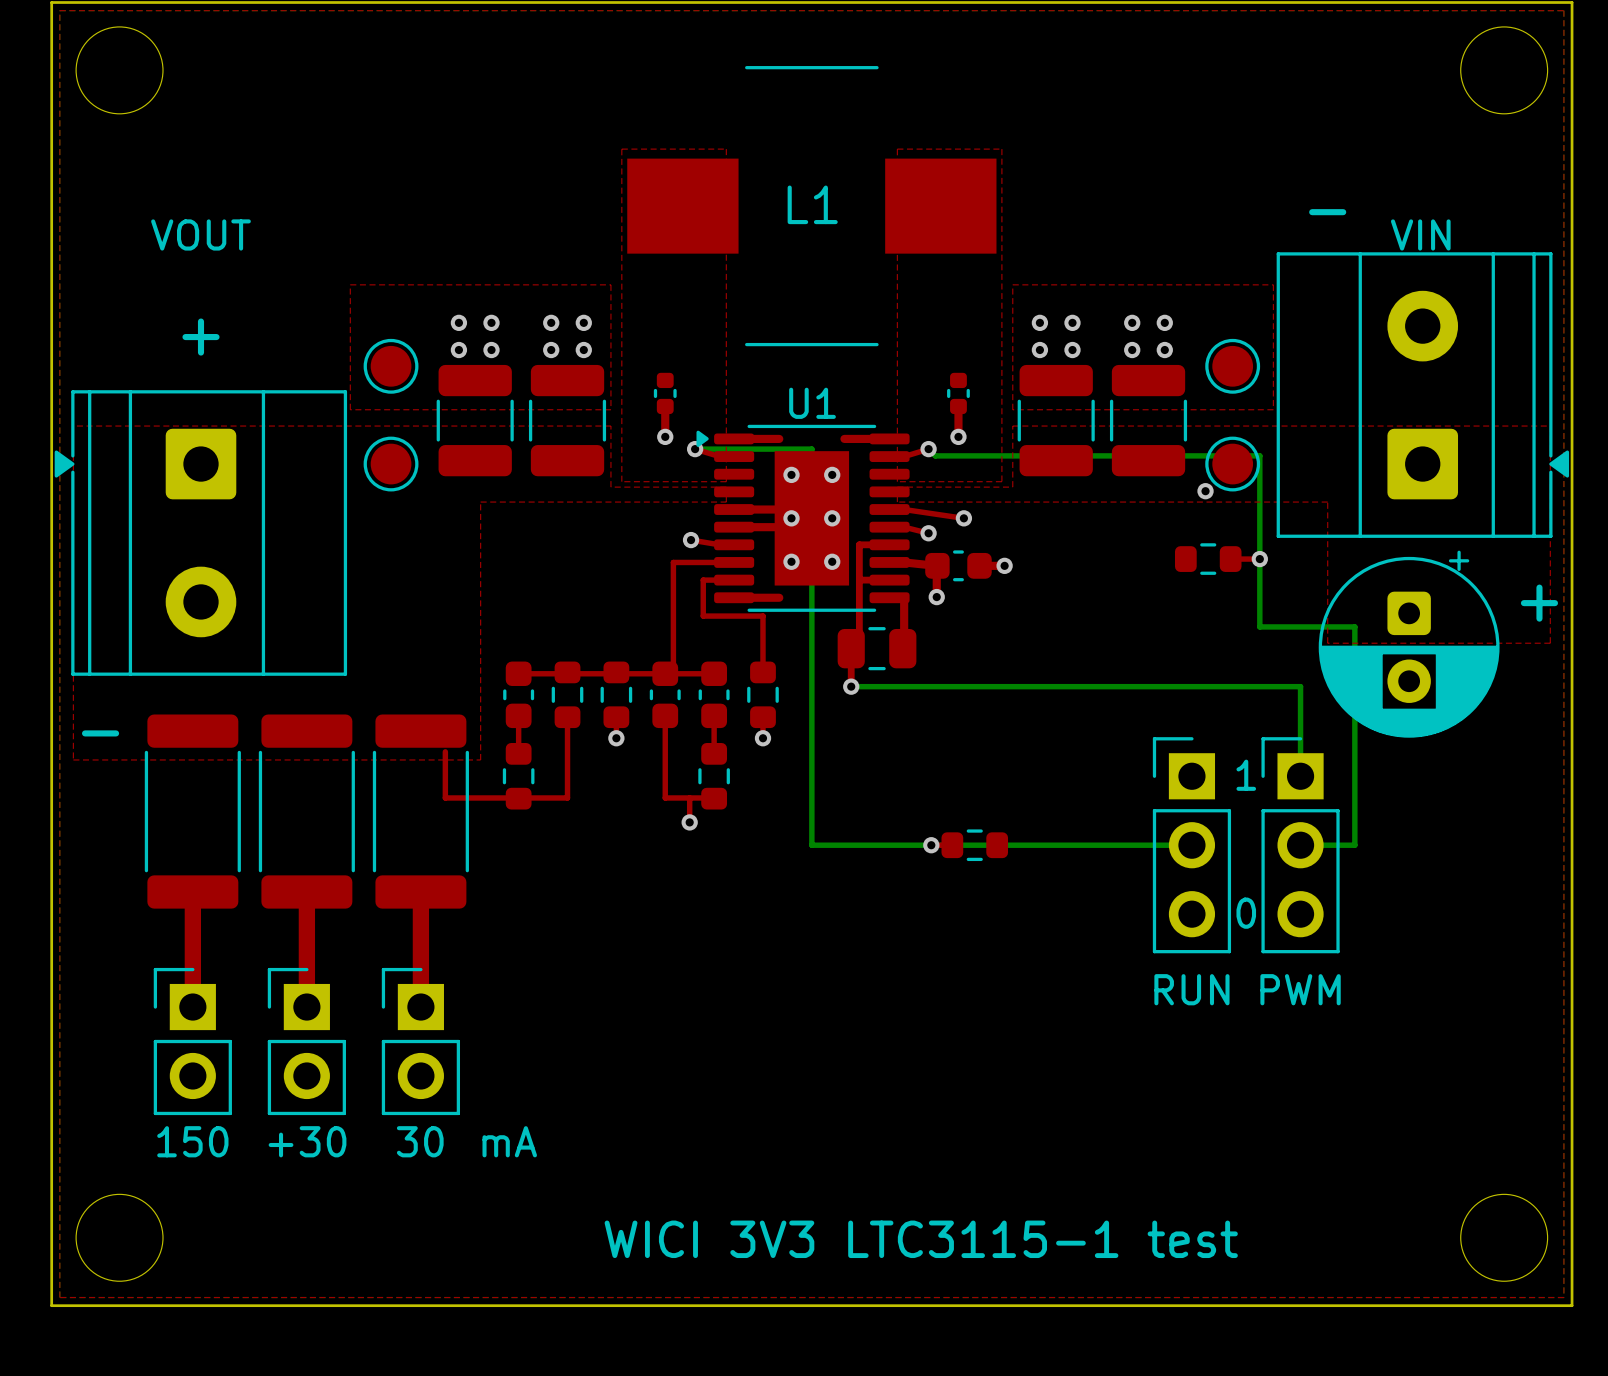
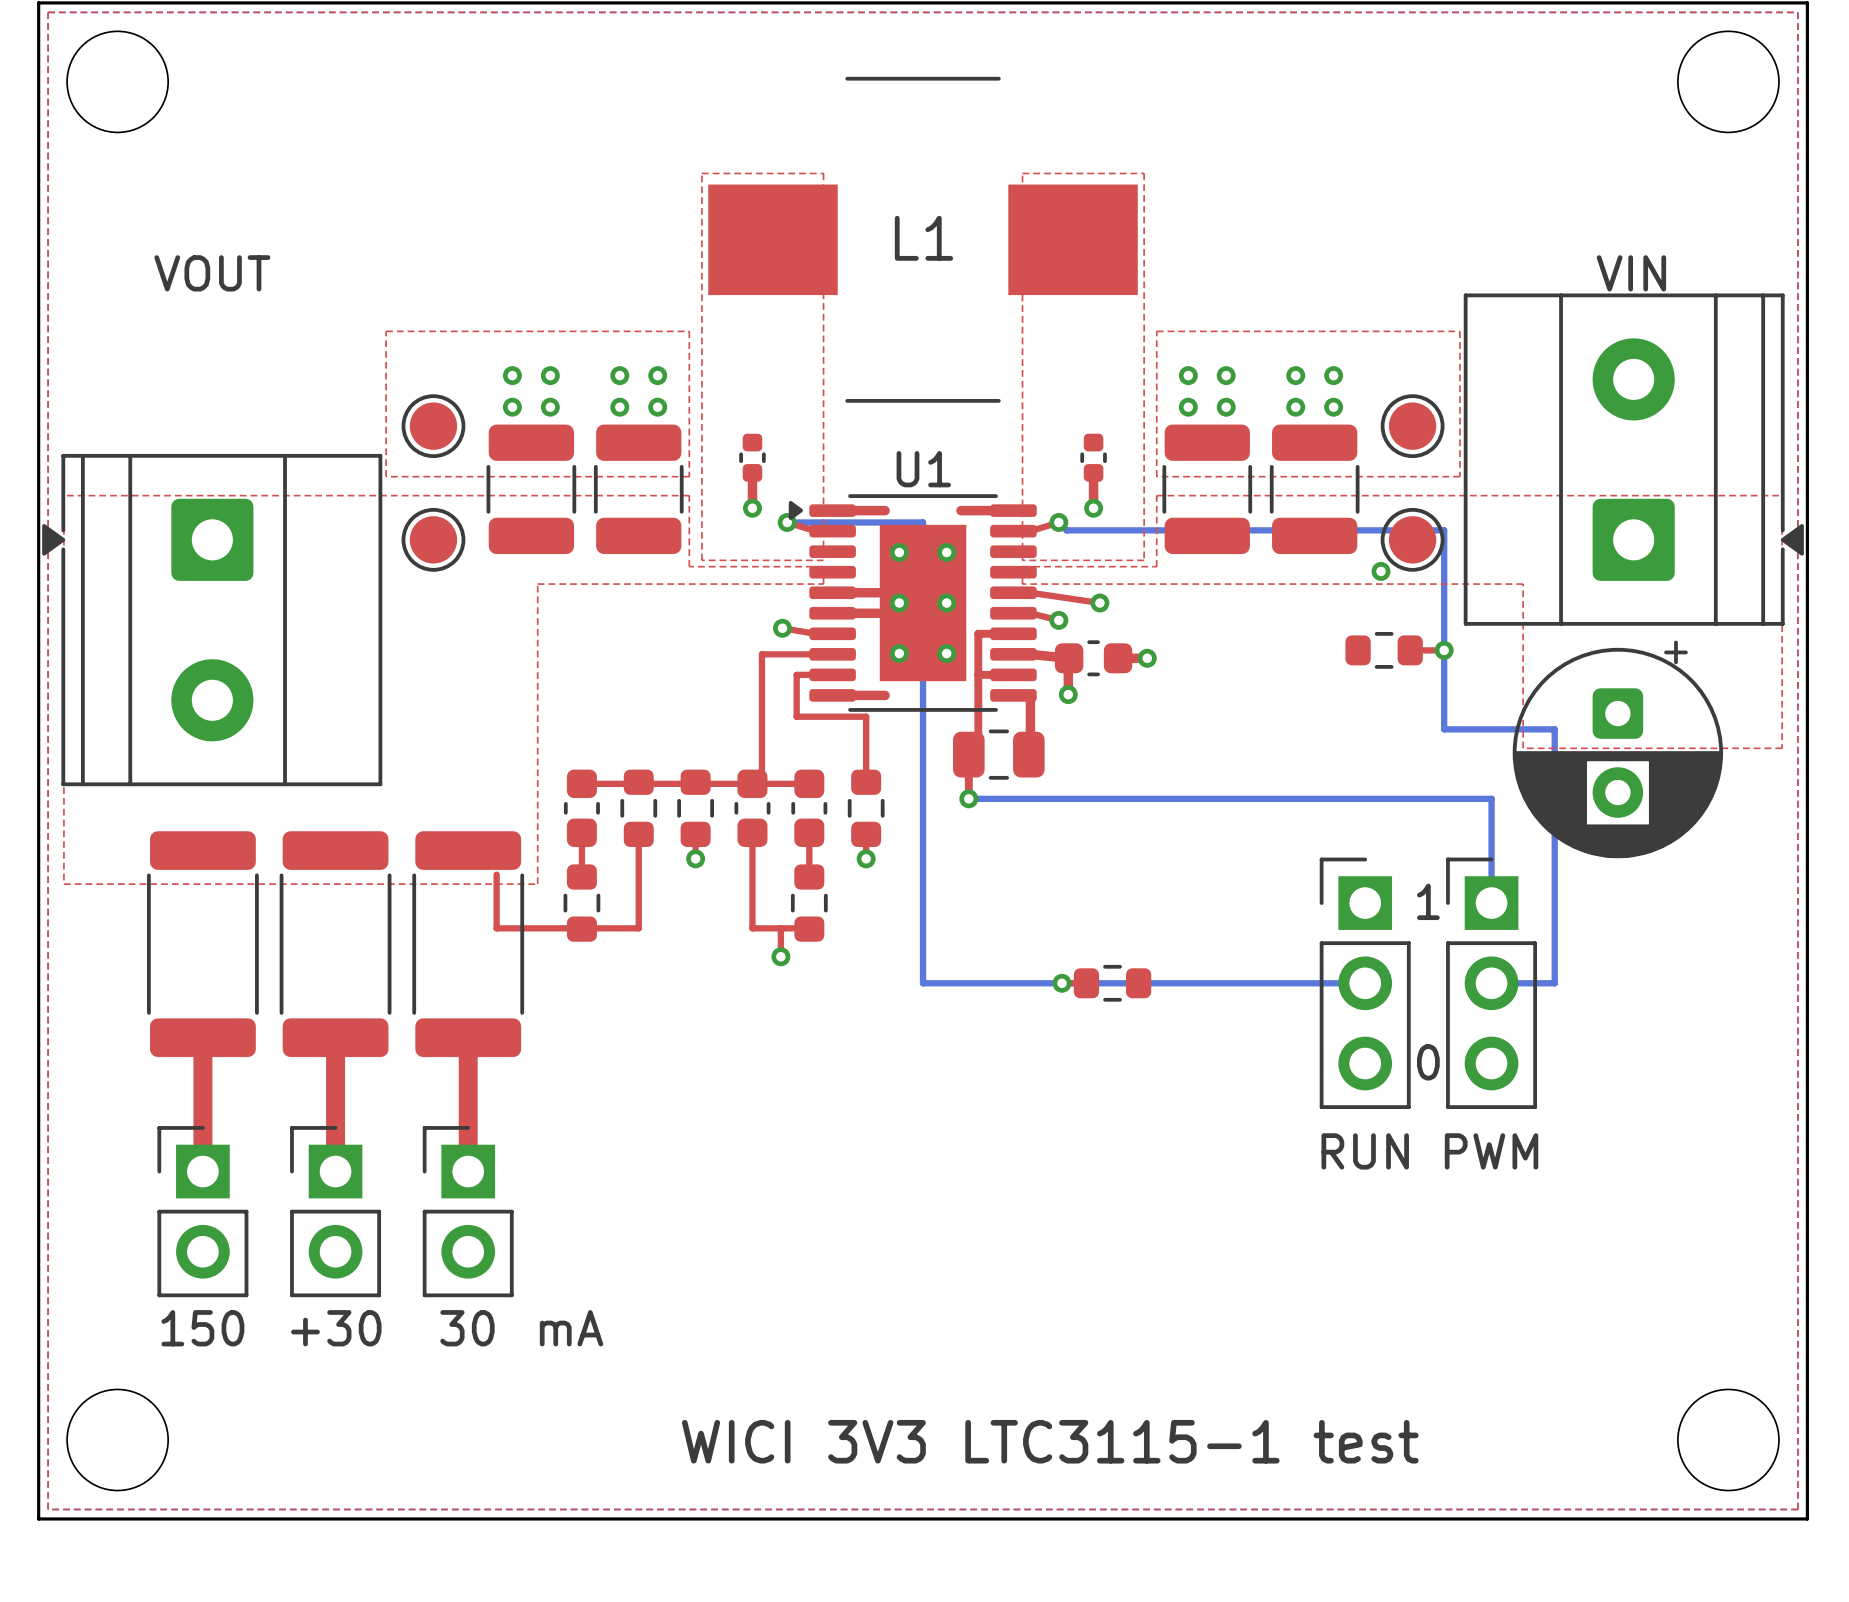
text: − (1327, 212) -> none
text: + (201, 337) -> none
text: + (1539, 603) -> none
text: − (100, 733) -> none

